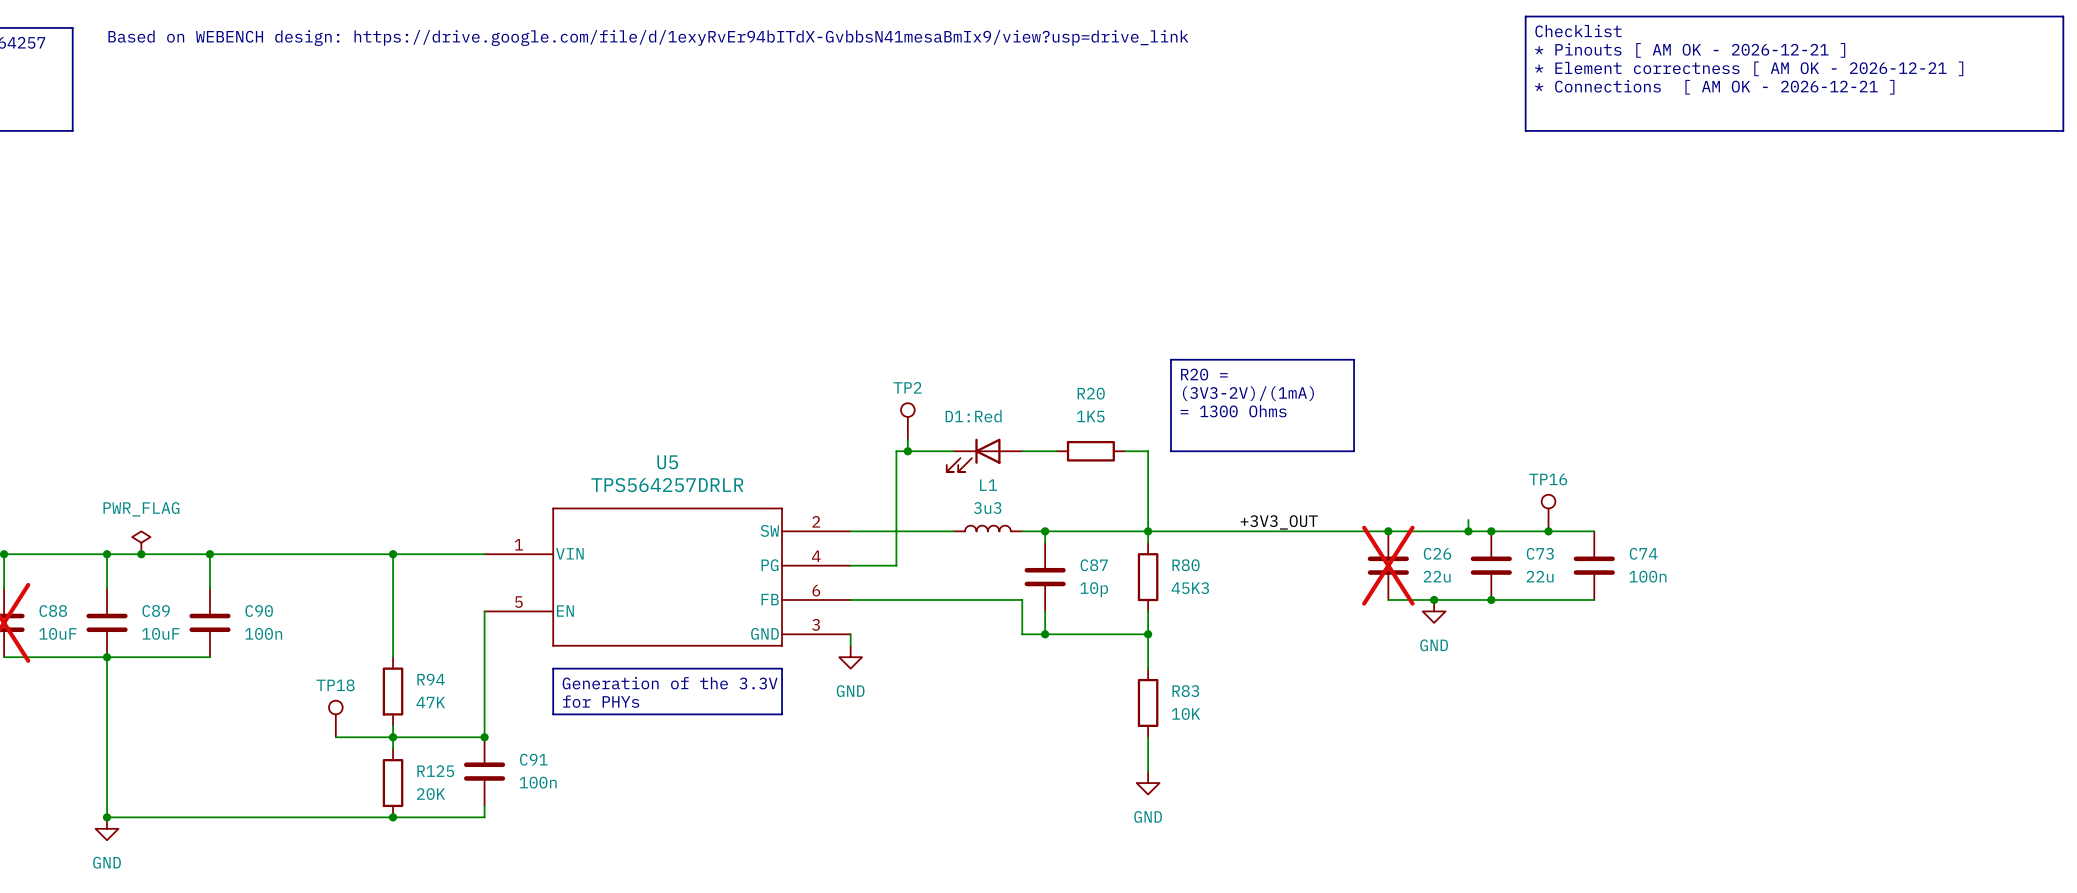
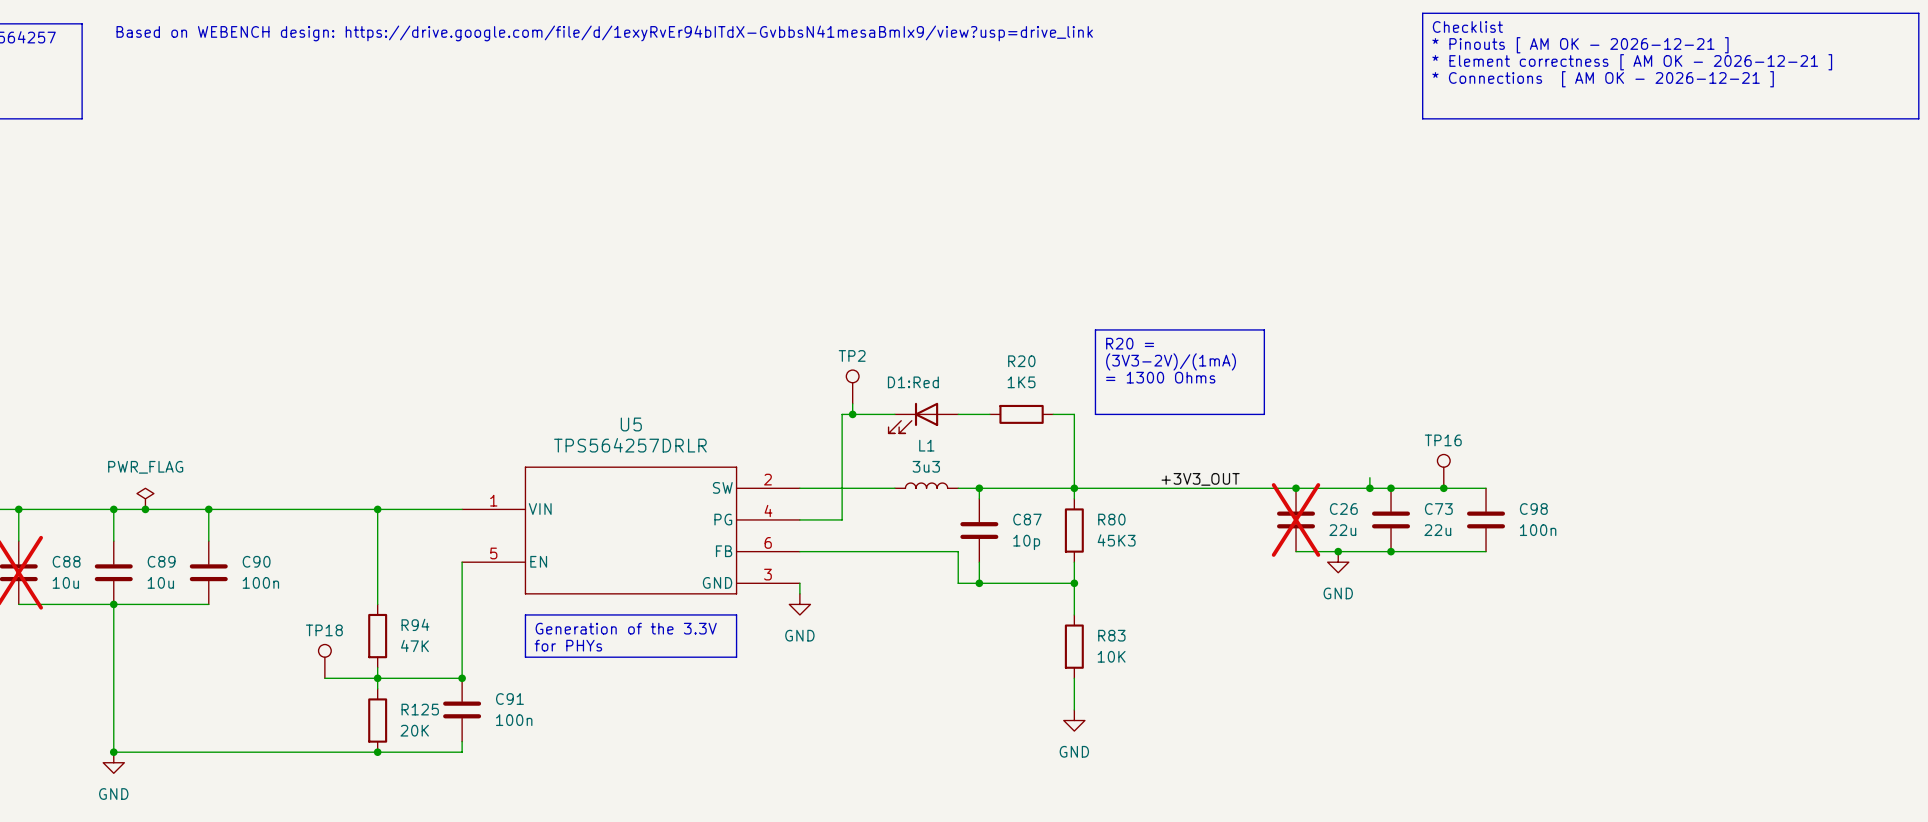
C74 name: C74 (1643, 553) -> C98 (1533, 509)
C88 value: 10uF (57, 633) -> 10u (65, 582)
C89 value: 10uF (160, 633) -> 10u (160, 582)

